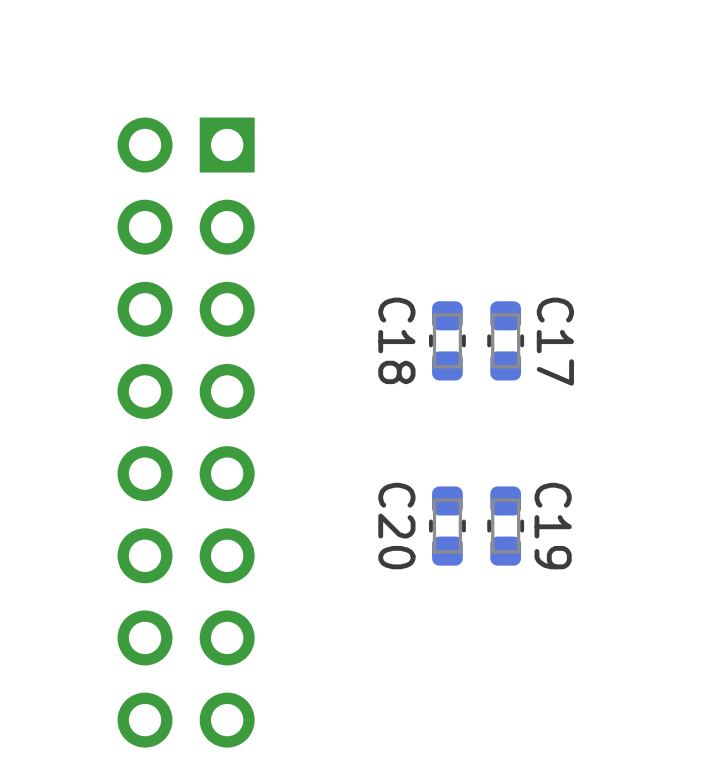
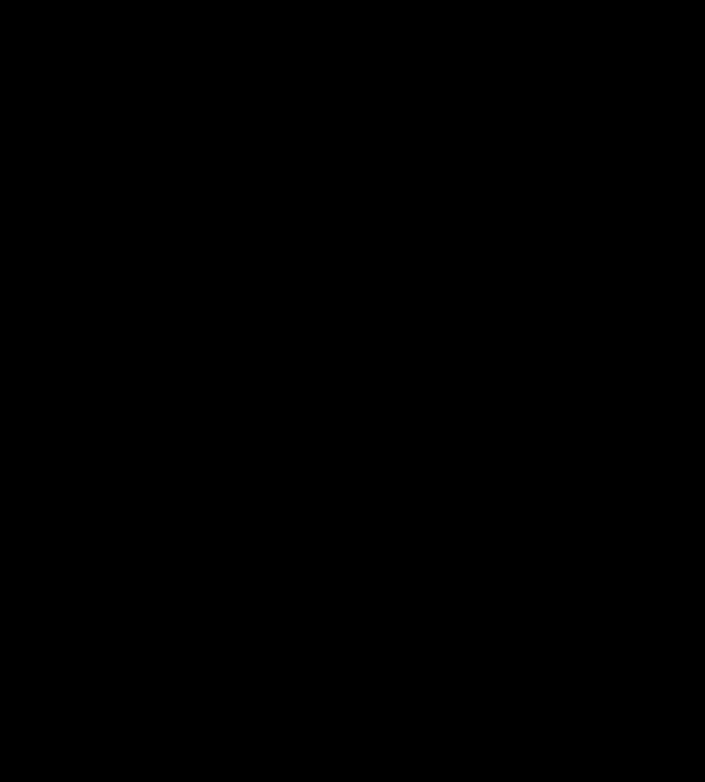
C18: (447, 340) -> none
C17: (505, 340) -> none
part: (186, 432) -> none
C20: (447, 526) -> none
C19: (505, 526) -> none

